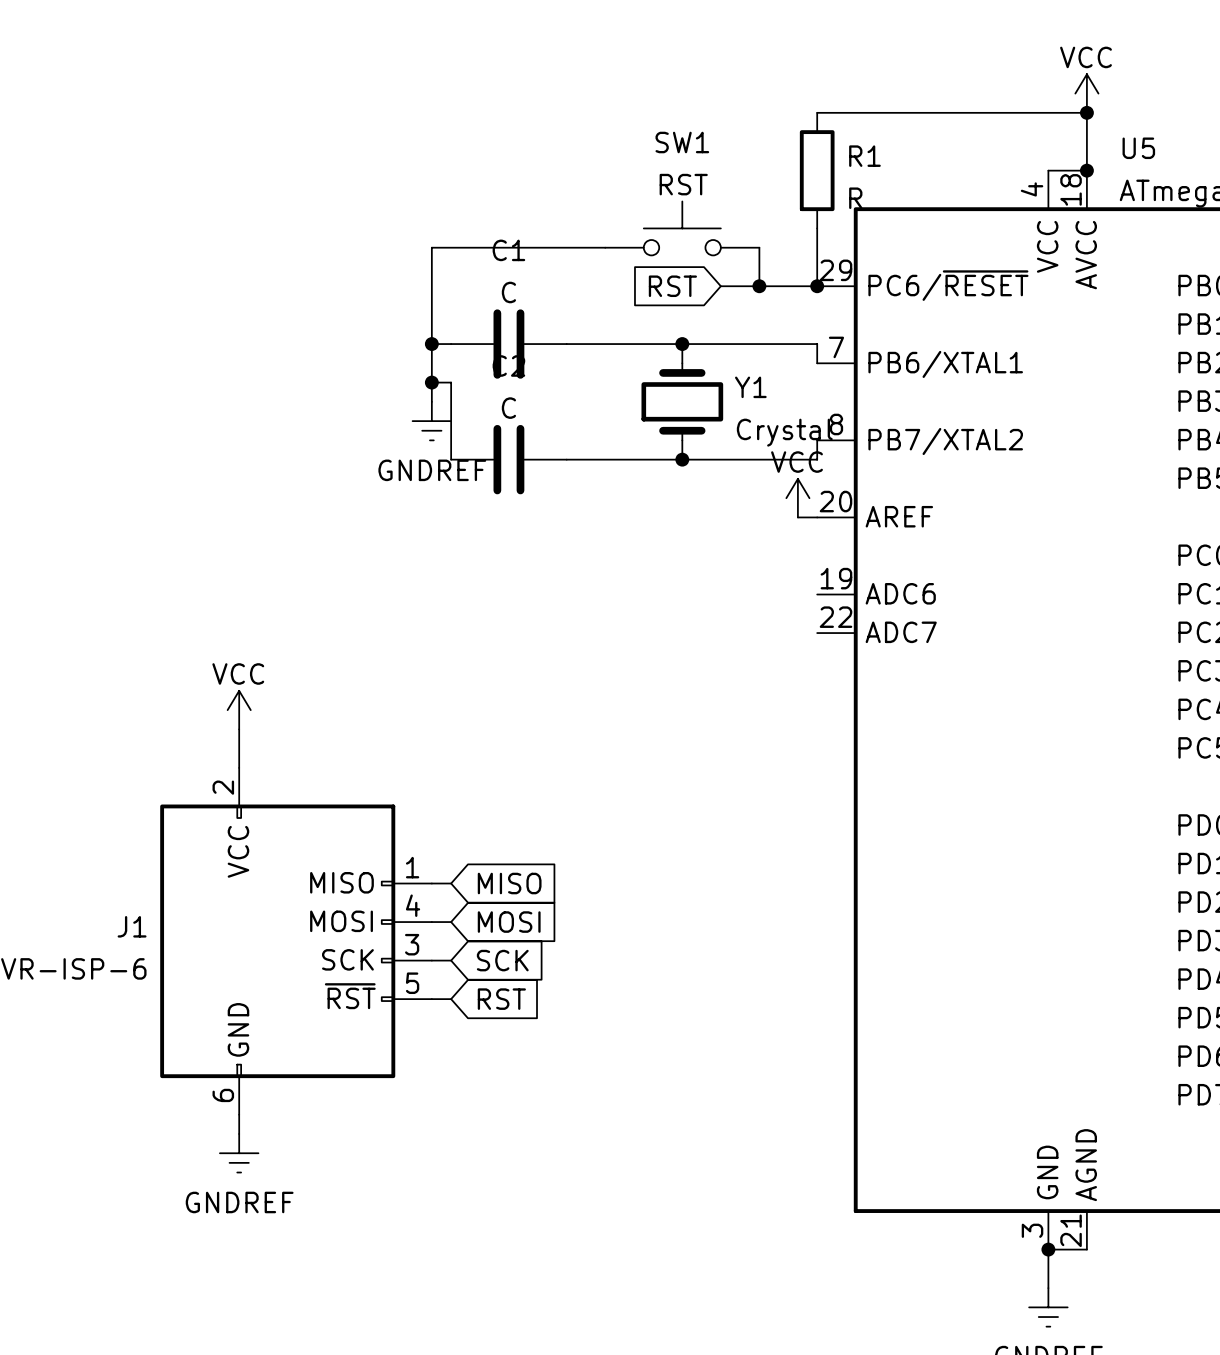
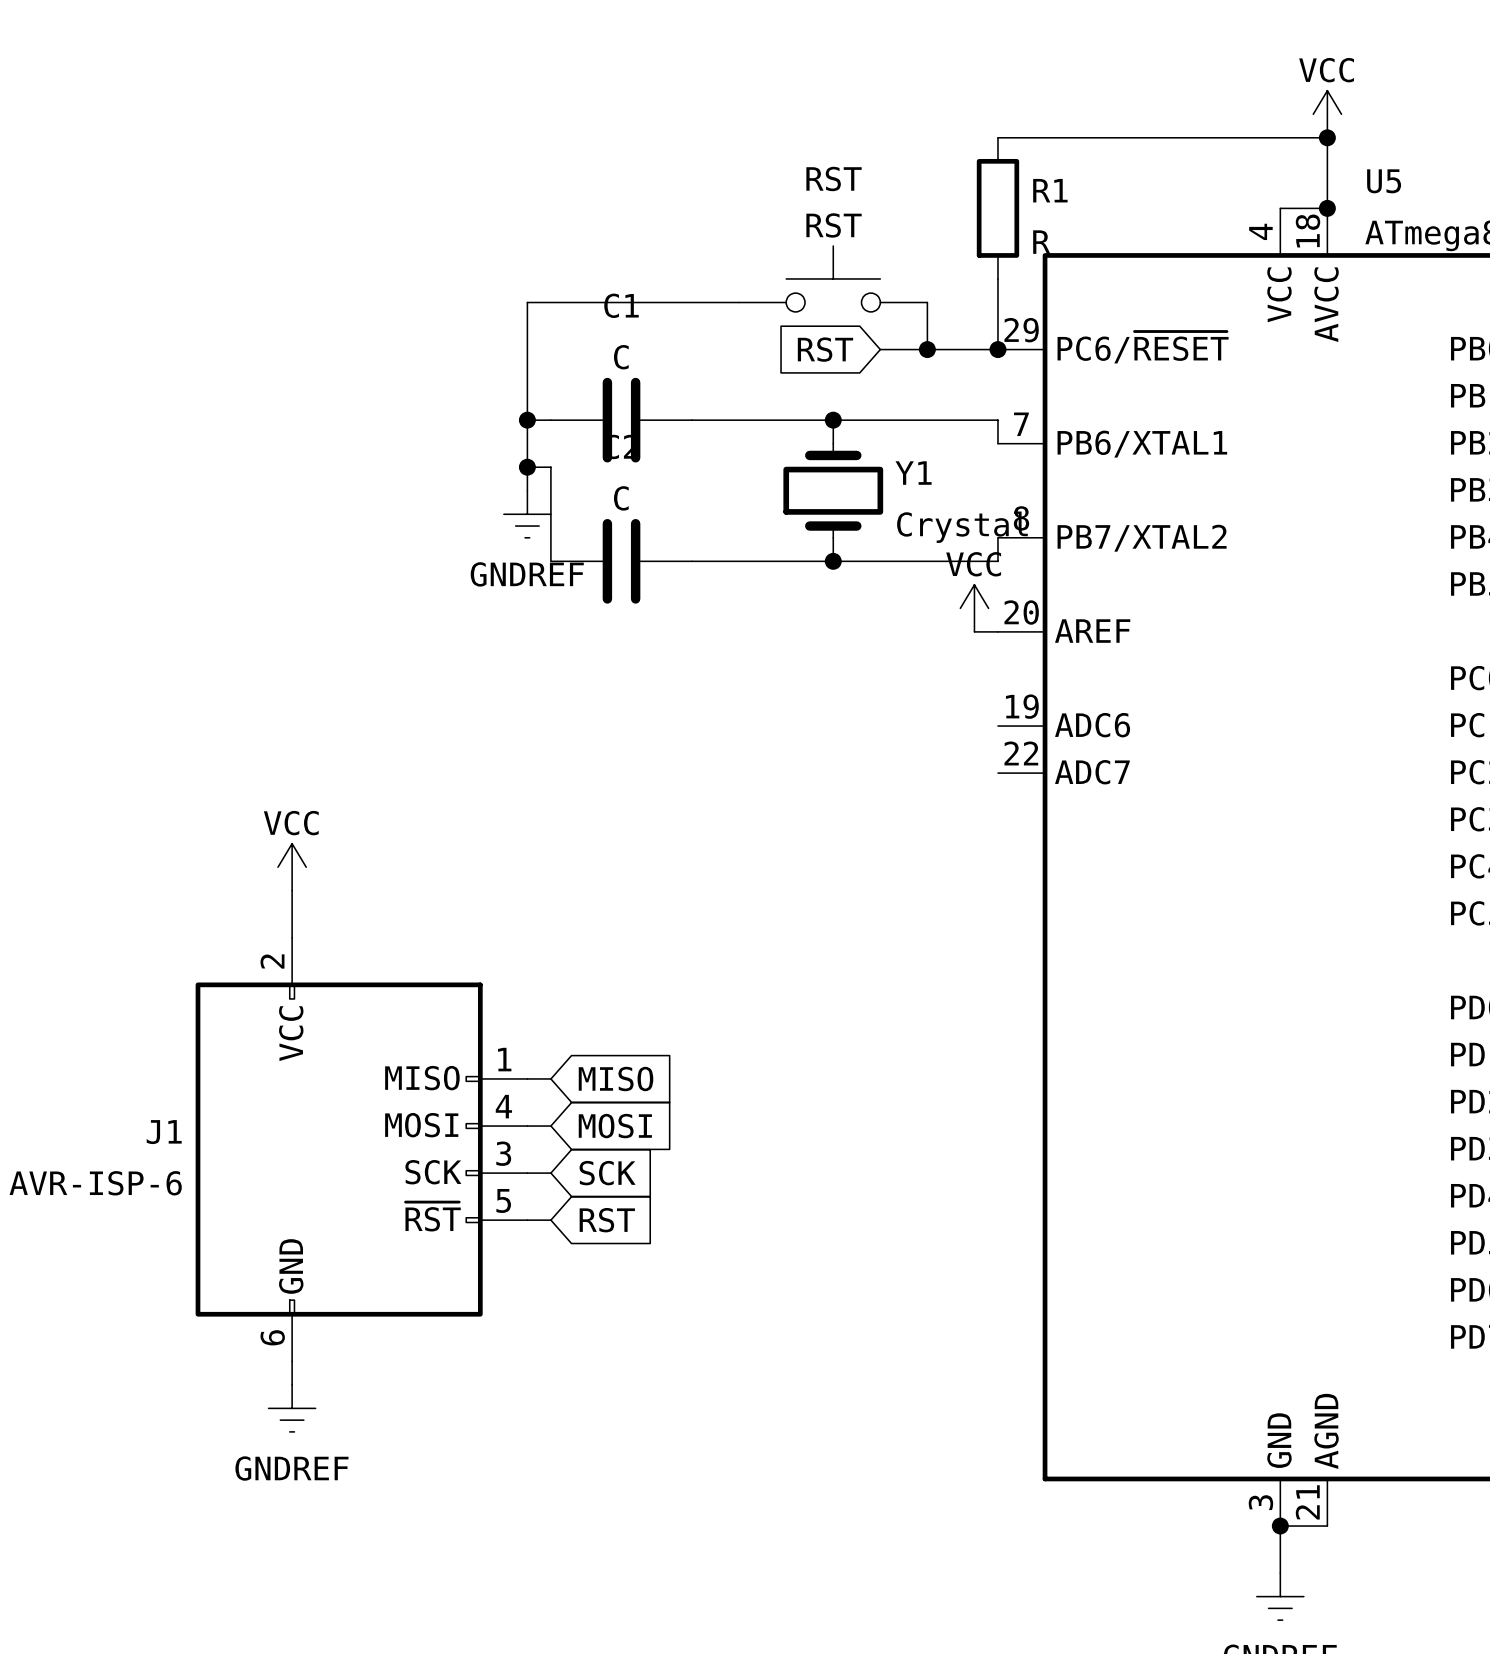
SW1 name: SW1 (682, 142) -> RST (834, 178)

